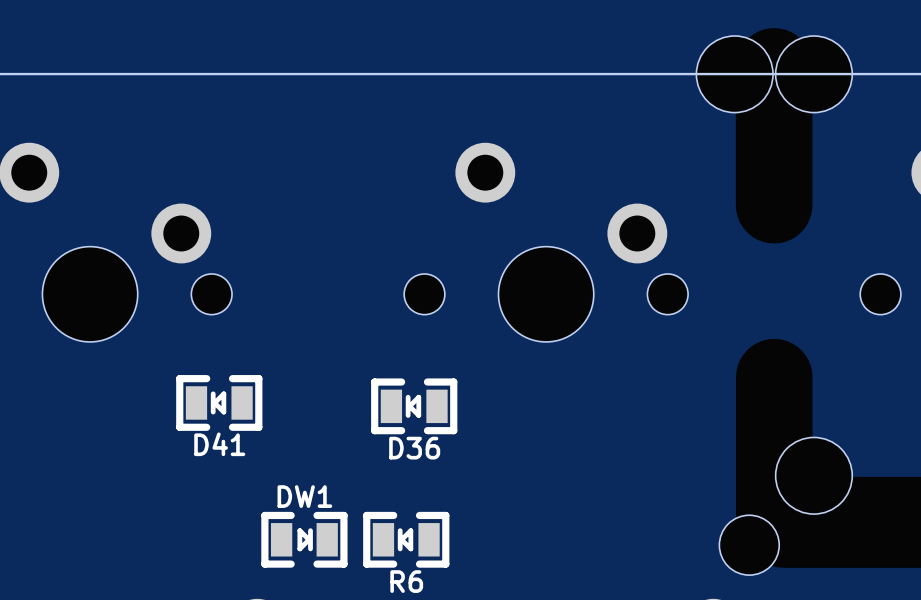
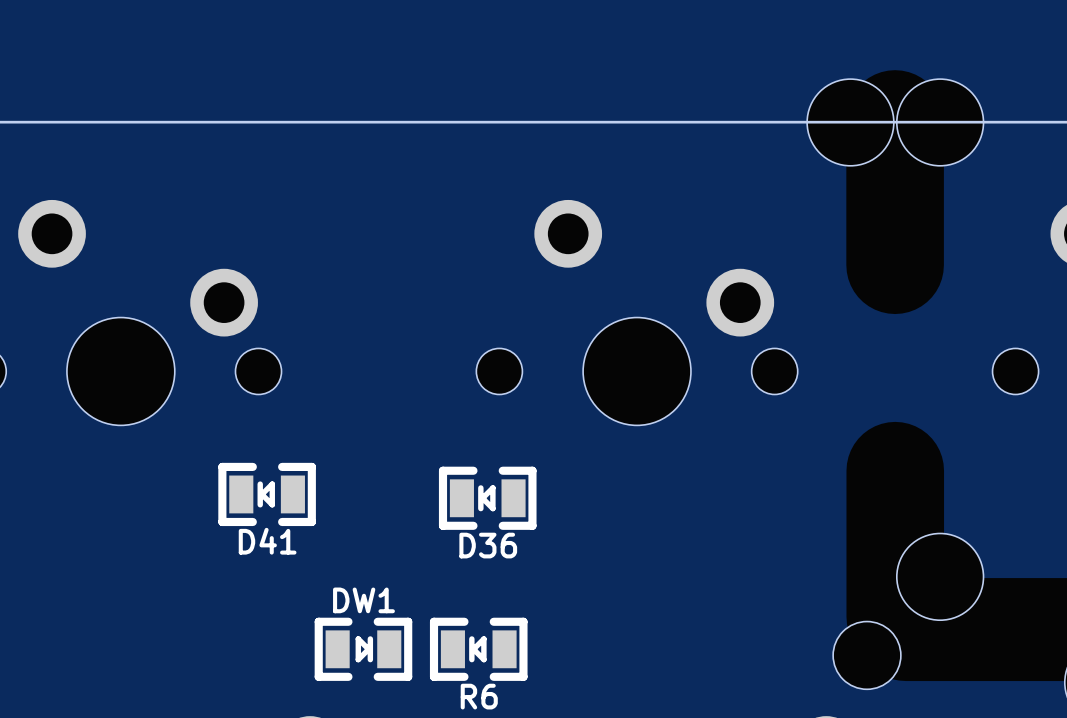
part footprint: [735, 28, 813, 244] -> [846, 70, 944, 315]
part footprint: [735, 338, 813, 555] -> [846, 421, 945, 666]

